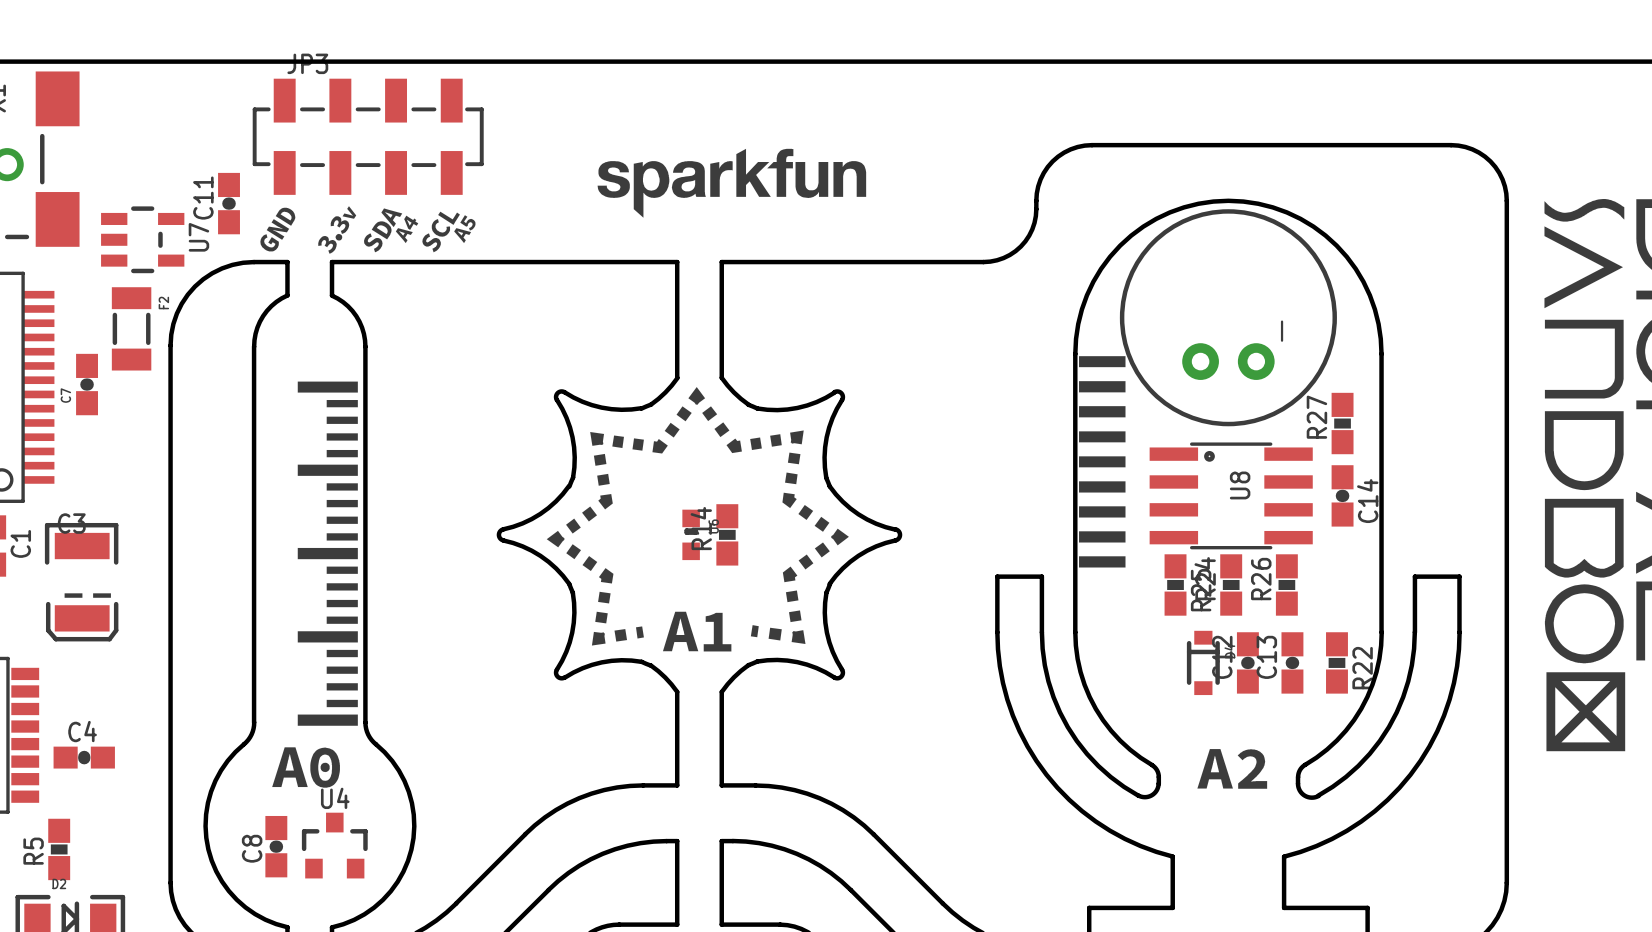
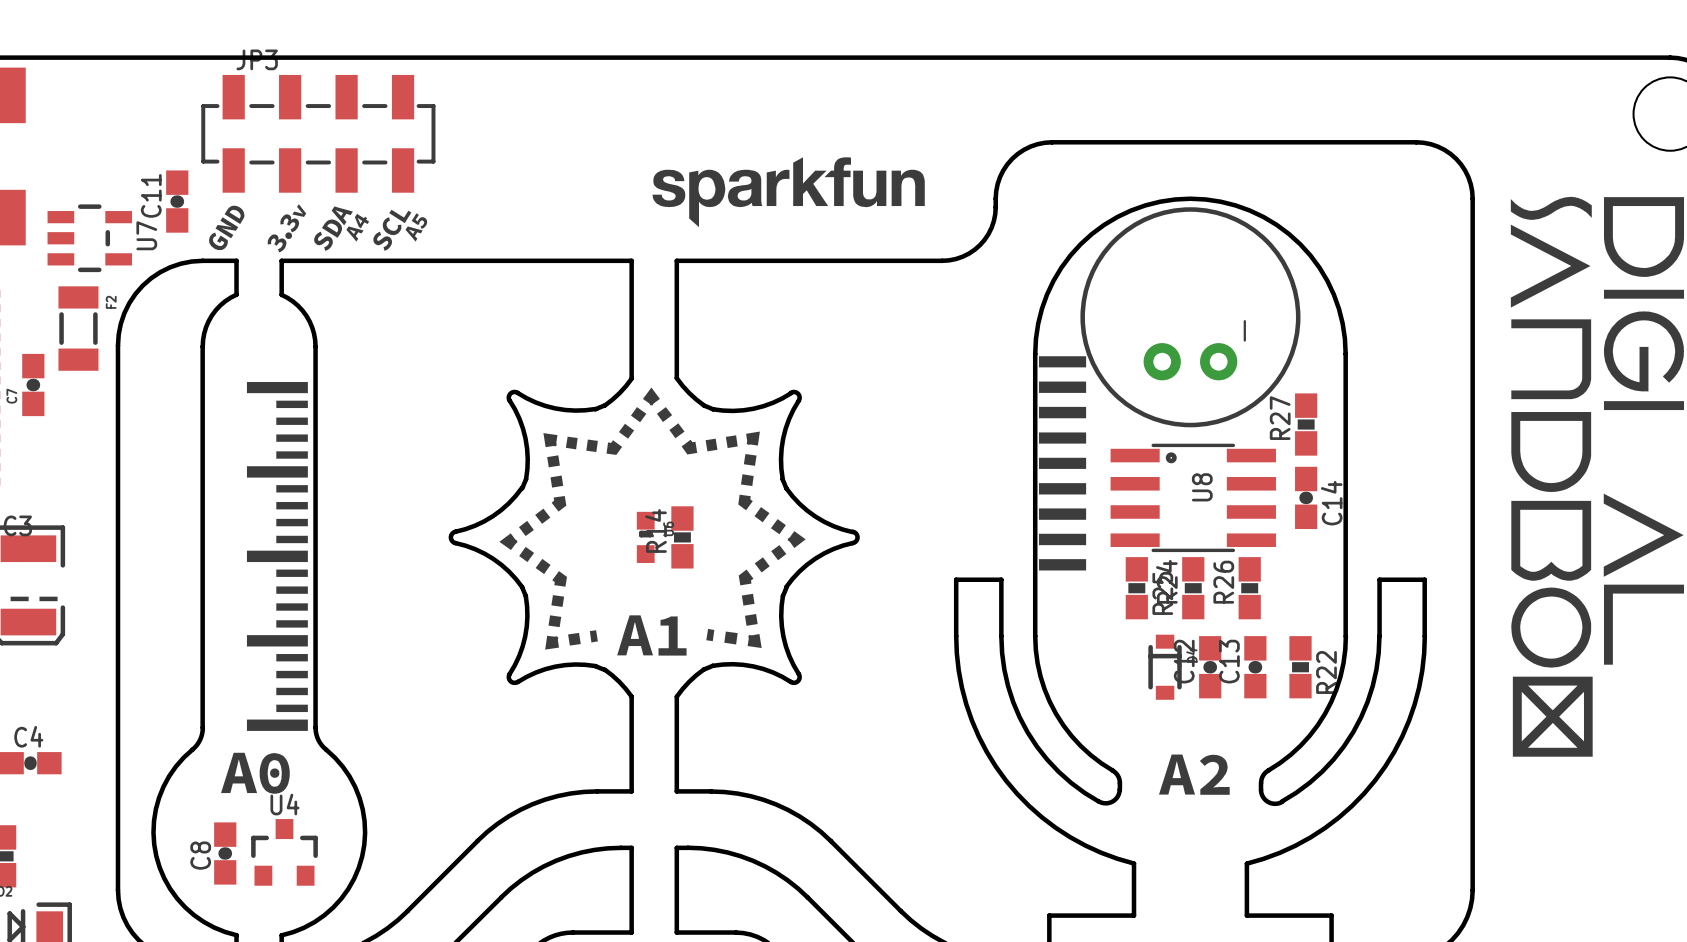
drawing position: (658, 168) -> (713, 177)
drawing position: (753, 172) -> (810, 181)
drawing position: (780, 172) -> (837, 181)
drawing position: (688, 178) -> (745, 187)
drawing position: (721, 178) -> (778, 187)
drawing position: (849, 178) -> (908, 187)
drawing position: (613, 179) -> (668, 188)
drawing position: (811, 179) -> (869, 188)
drawing position: (651, 189) -> (707, 198)
drawing position: (681, 194) -> (737, 203)

